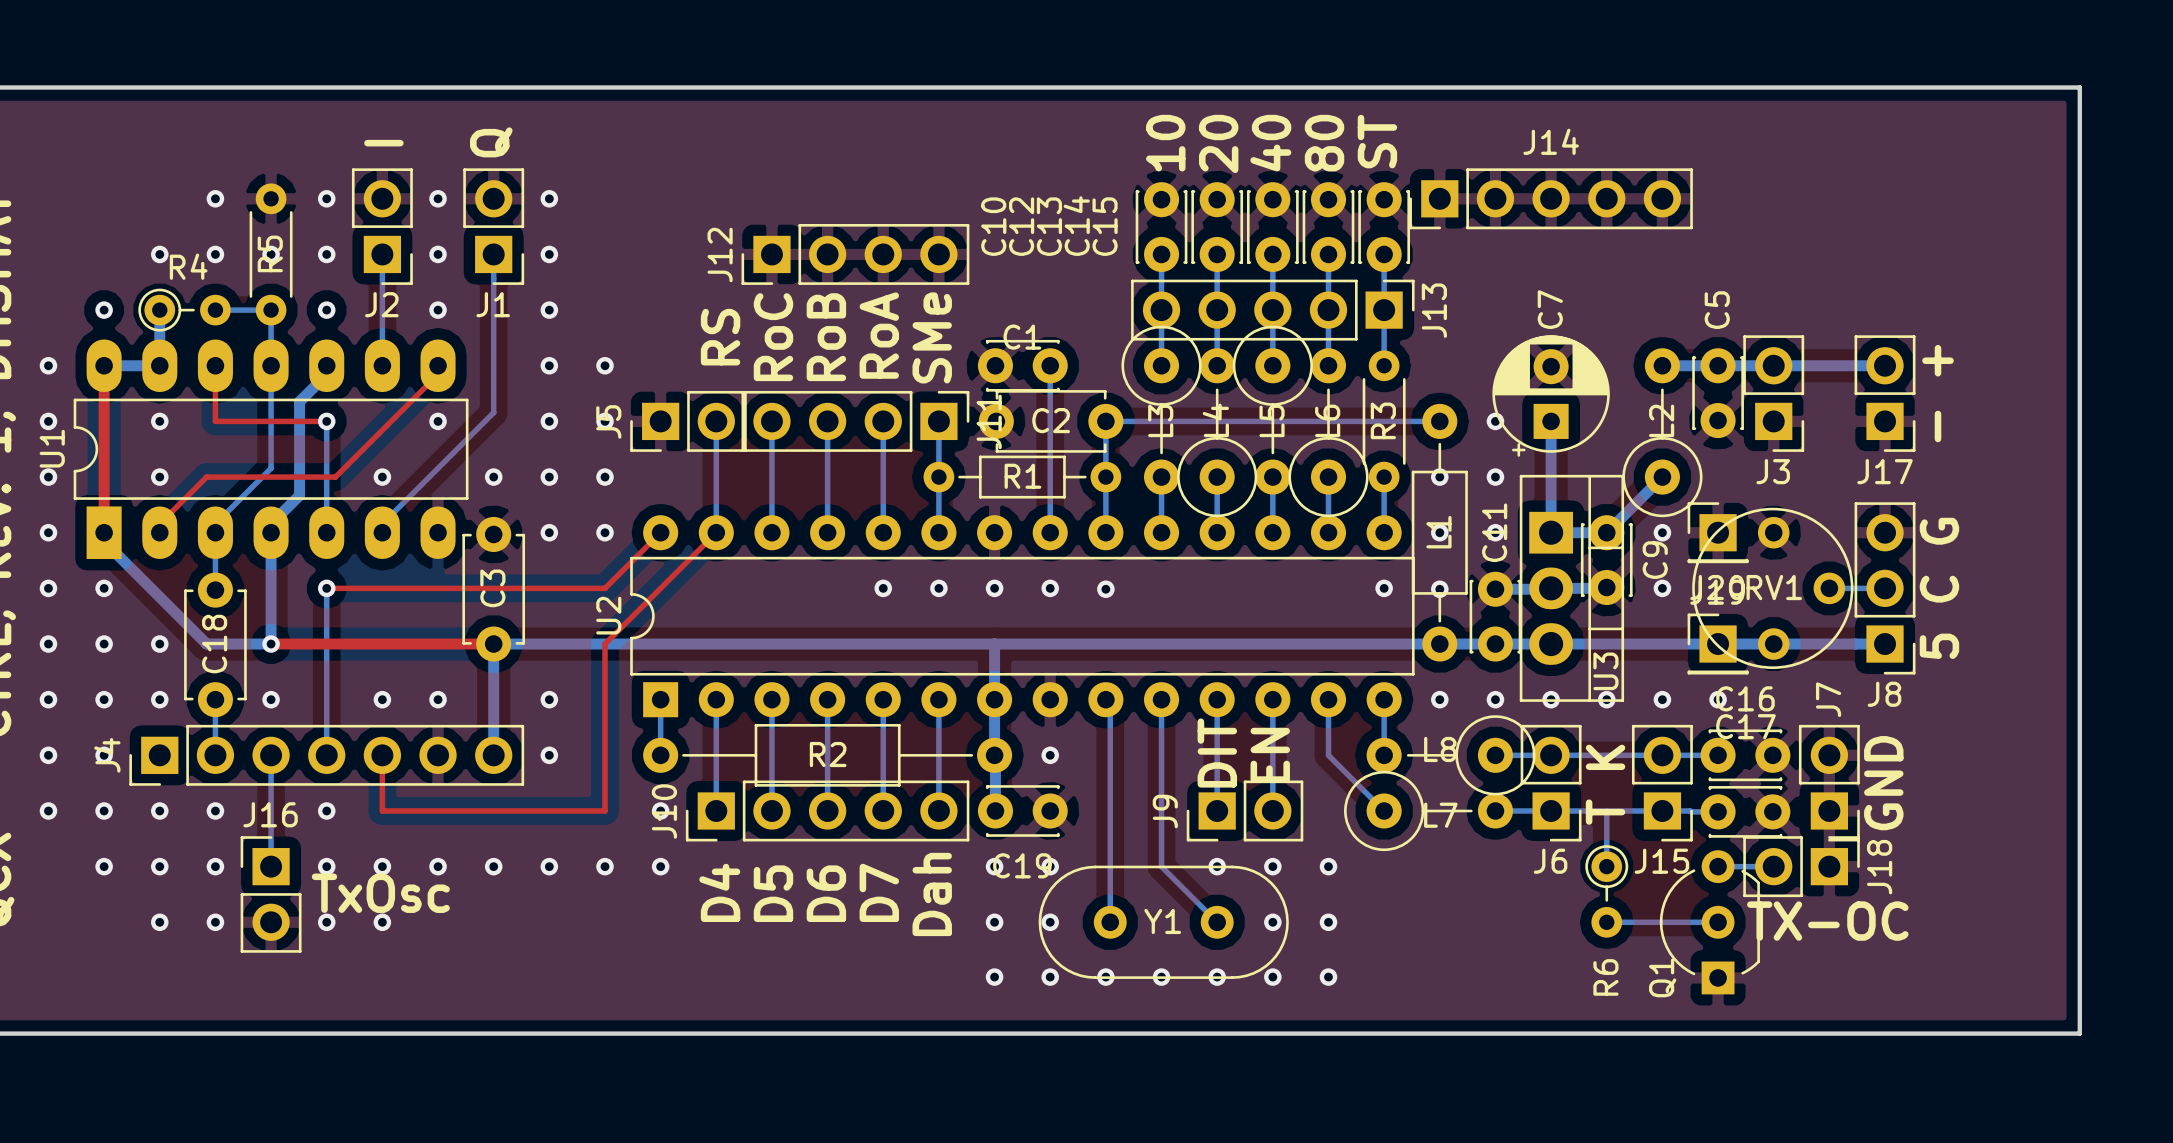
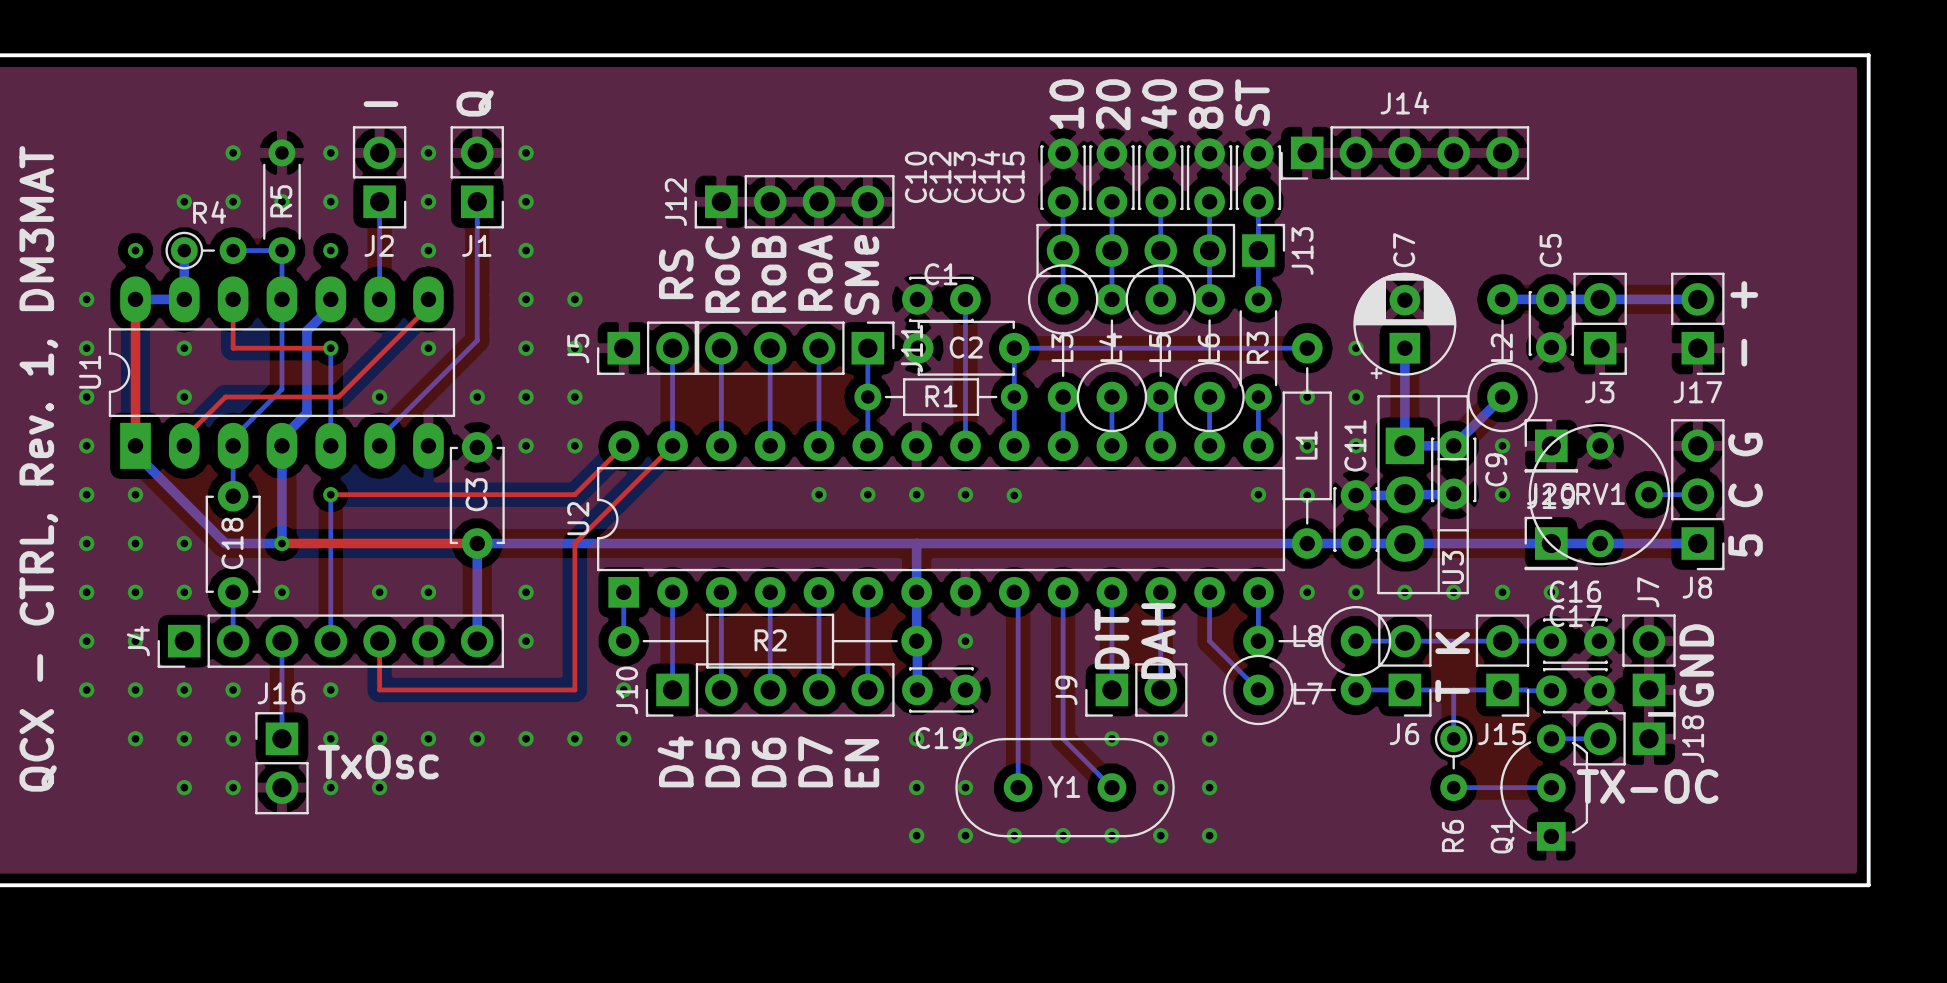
text: EN (1270, 755) -> DAH (1158, 641)
text: Dah (932, 894) -> EN (861, 763)

